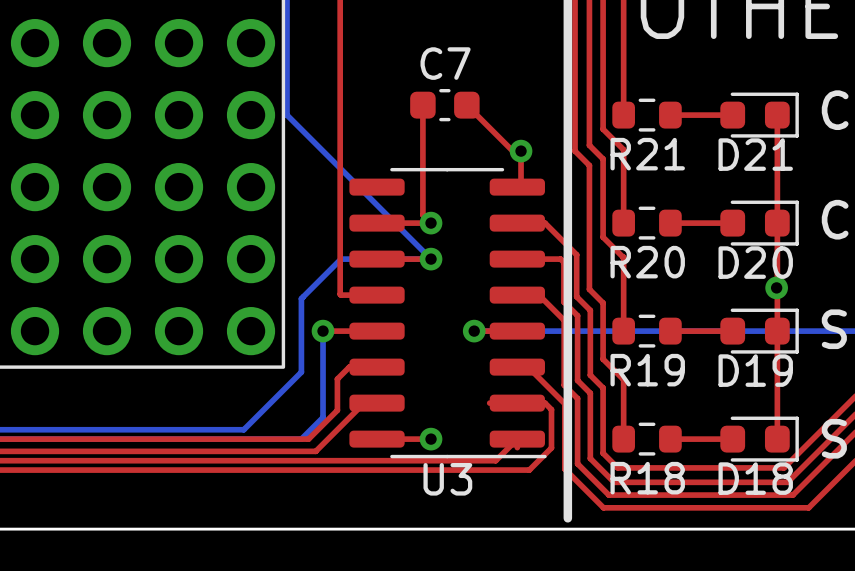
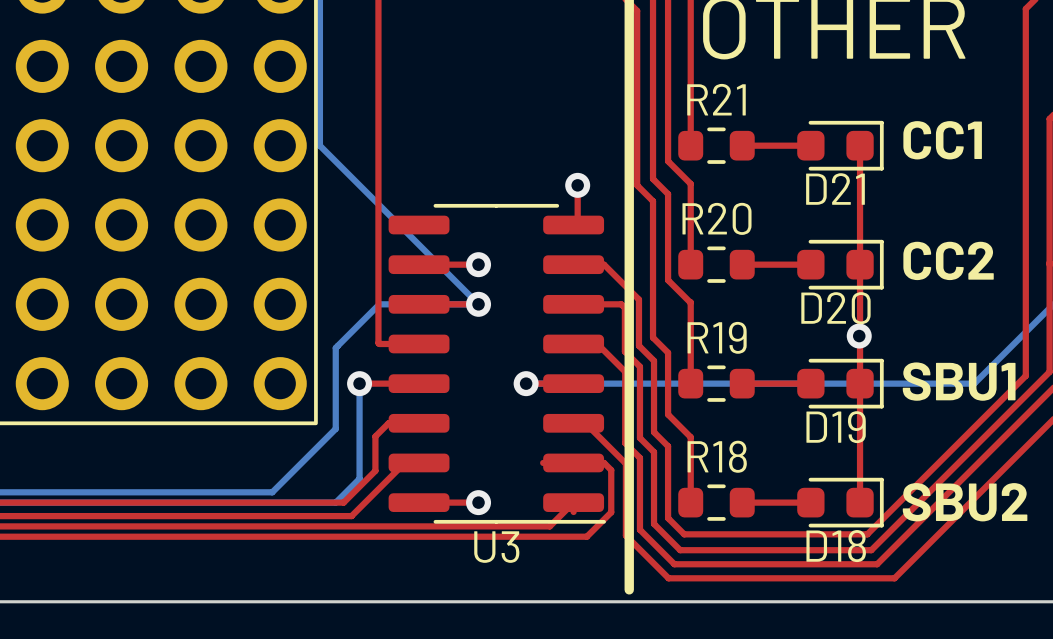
top track: (422, 105) (422, 215) (431, 223) -> none
C7: (444, 105) -> none
top track: (466, 105) (512, 151) (521, 151) -> none
R21 name position: R21 (647, 154) -> R21 (716, 99)
R20 name position: R20 (647, 262) -> R20 (717, 218)
R19 name position: R19 (647, 370) -> R19 (717, 337)
R18 name position: R18 (647, 478) -> R18 (717, 456)

